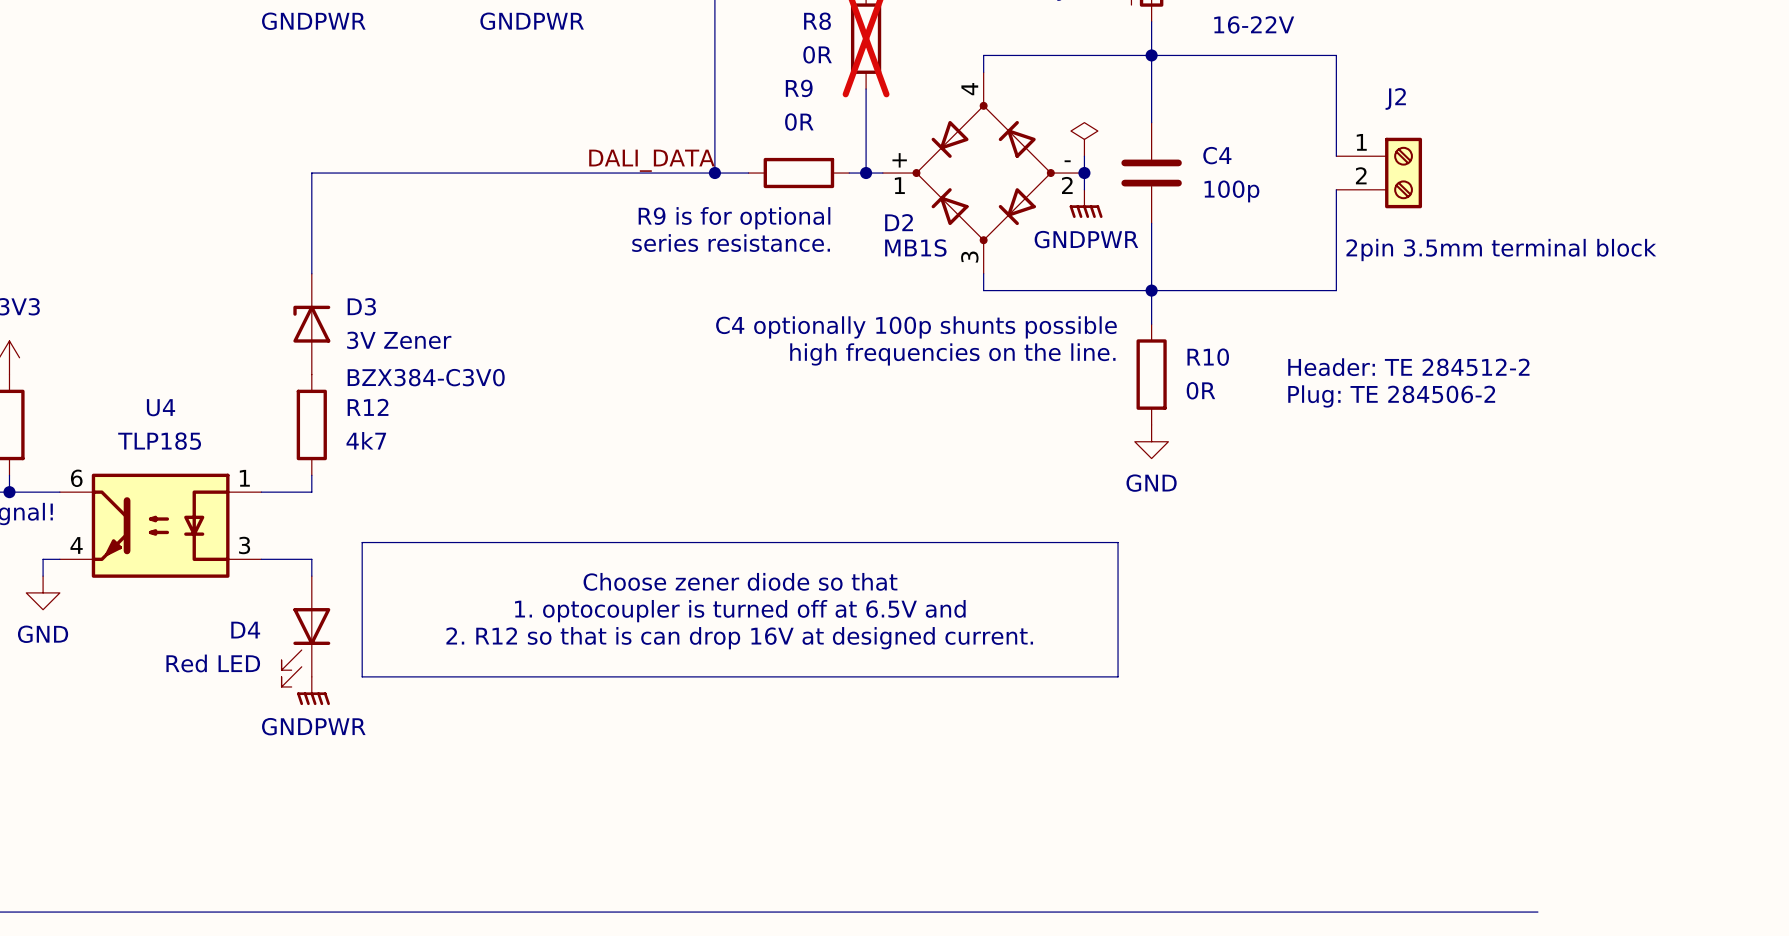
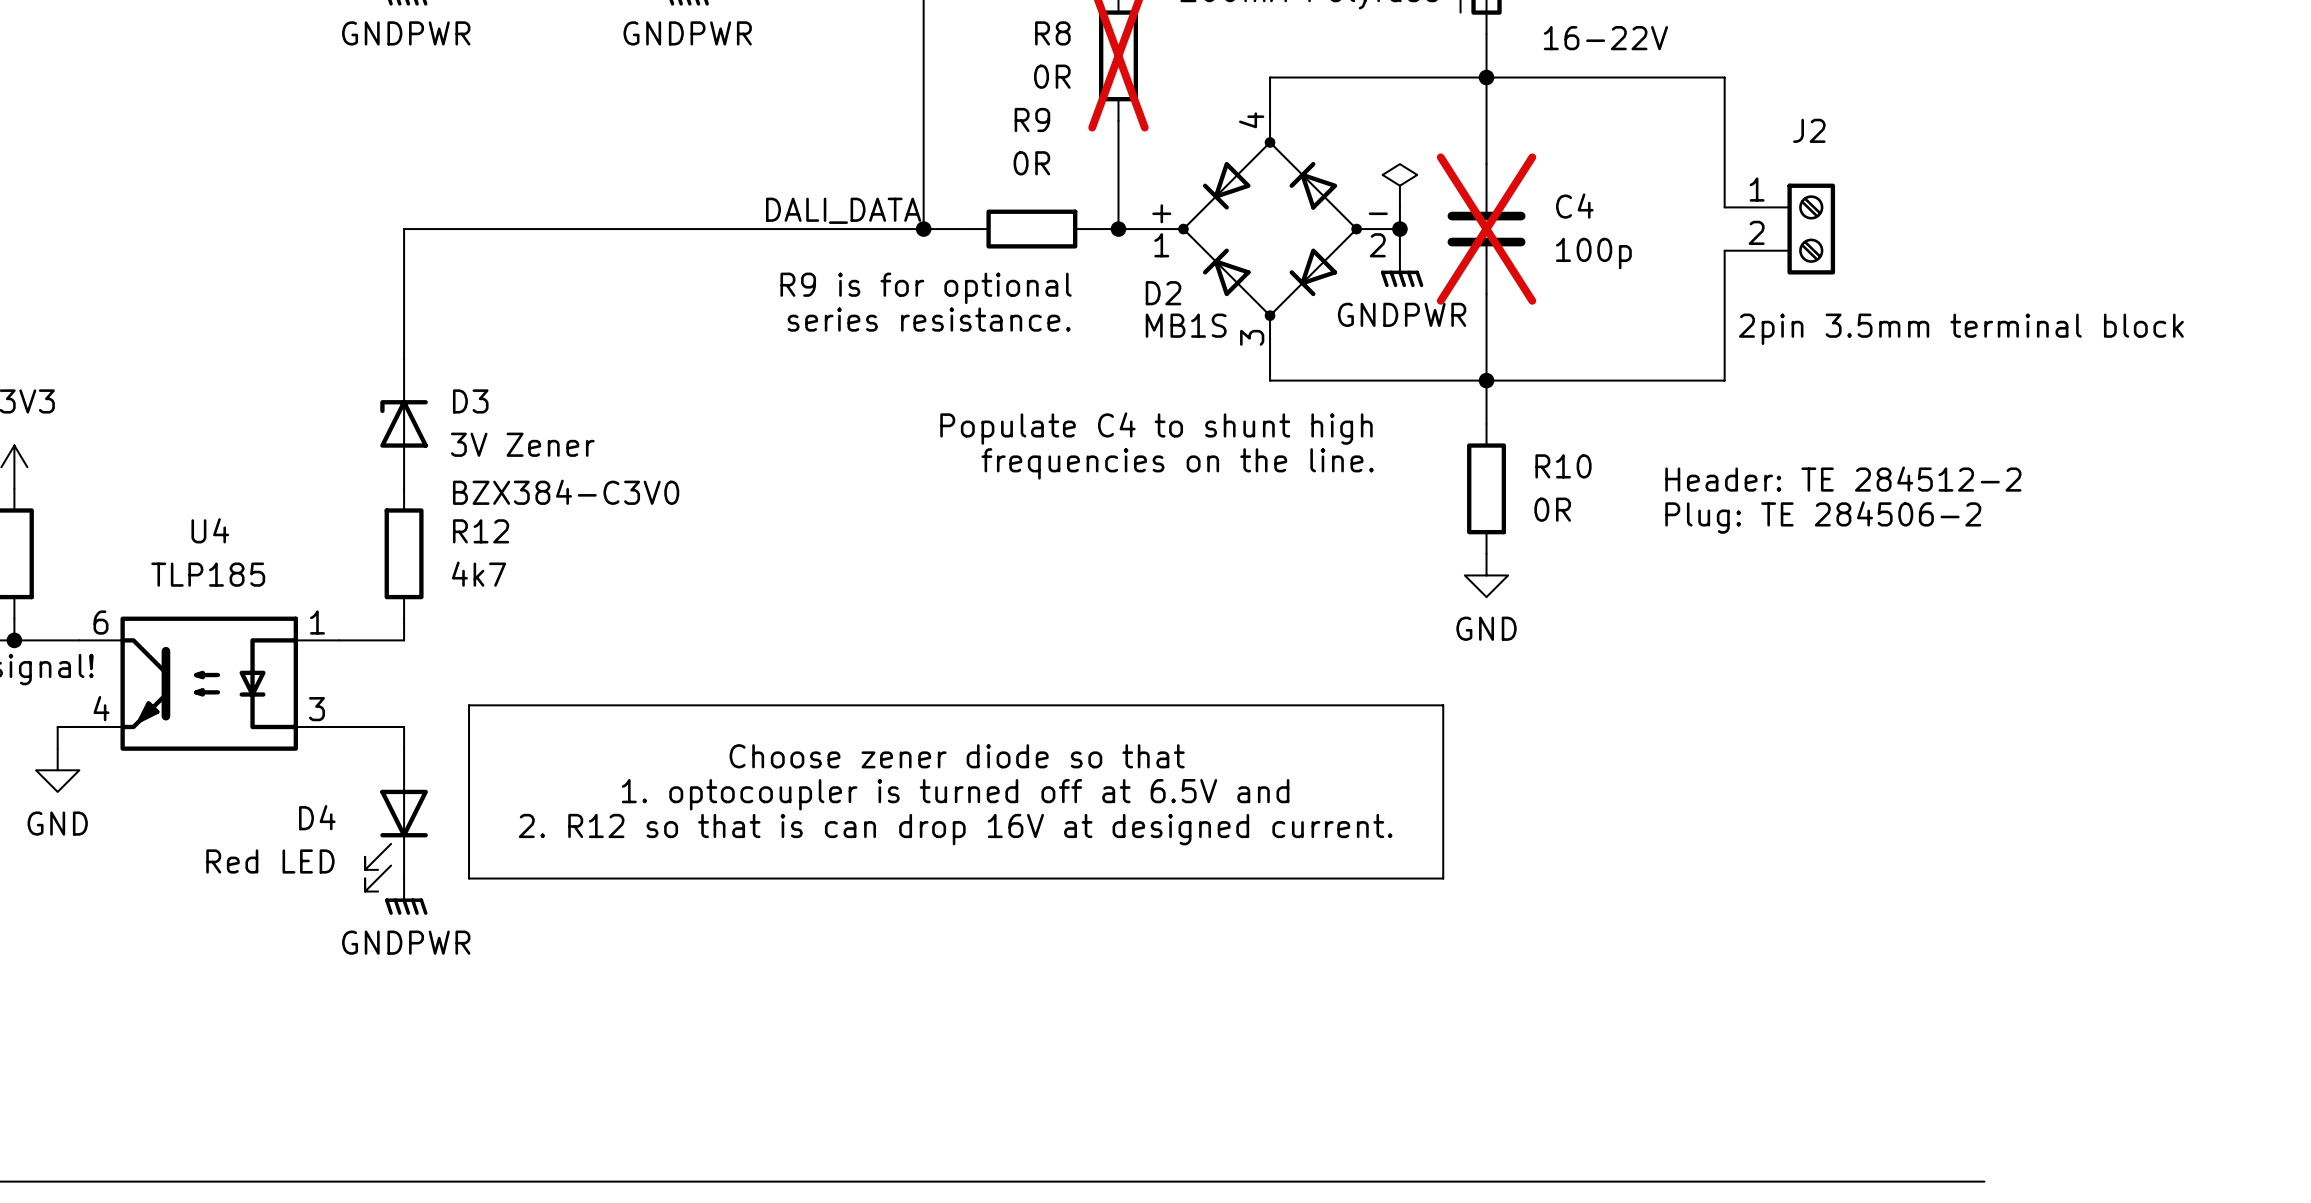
C4 do-not-place cross: none -> (1486, 229)
text: C4 optionally 100p shunts possible (916, 327) -> none
text: none -> Populate C4 to shunt high (1156, 428)
text: high frequencies on the line. (952, 354) -> frequencies on the line. (1177, 463)

